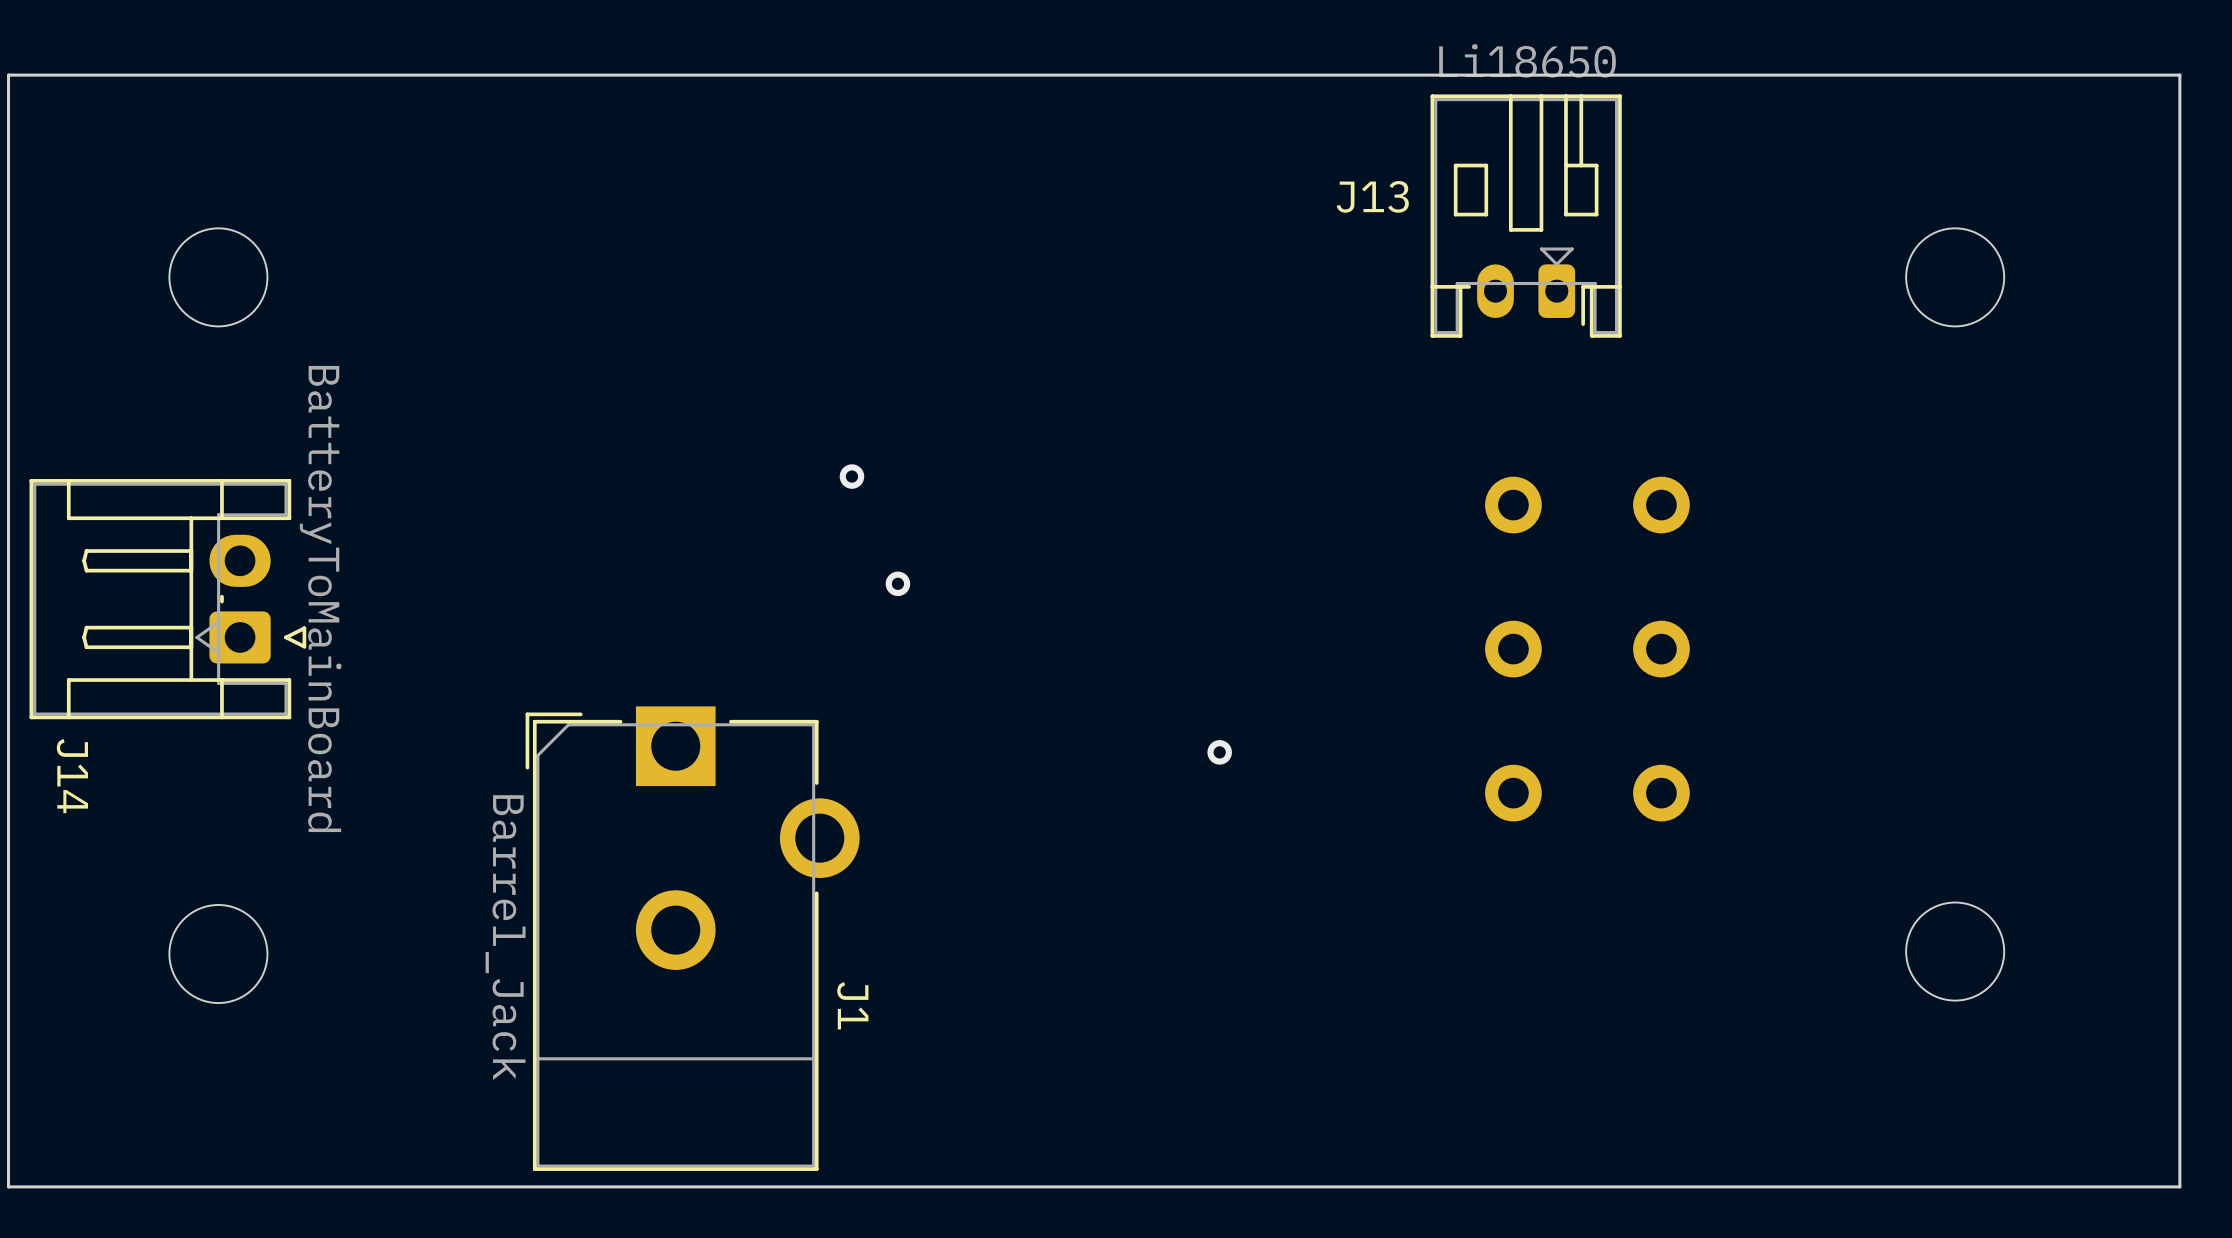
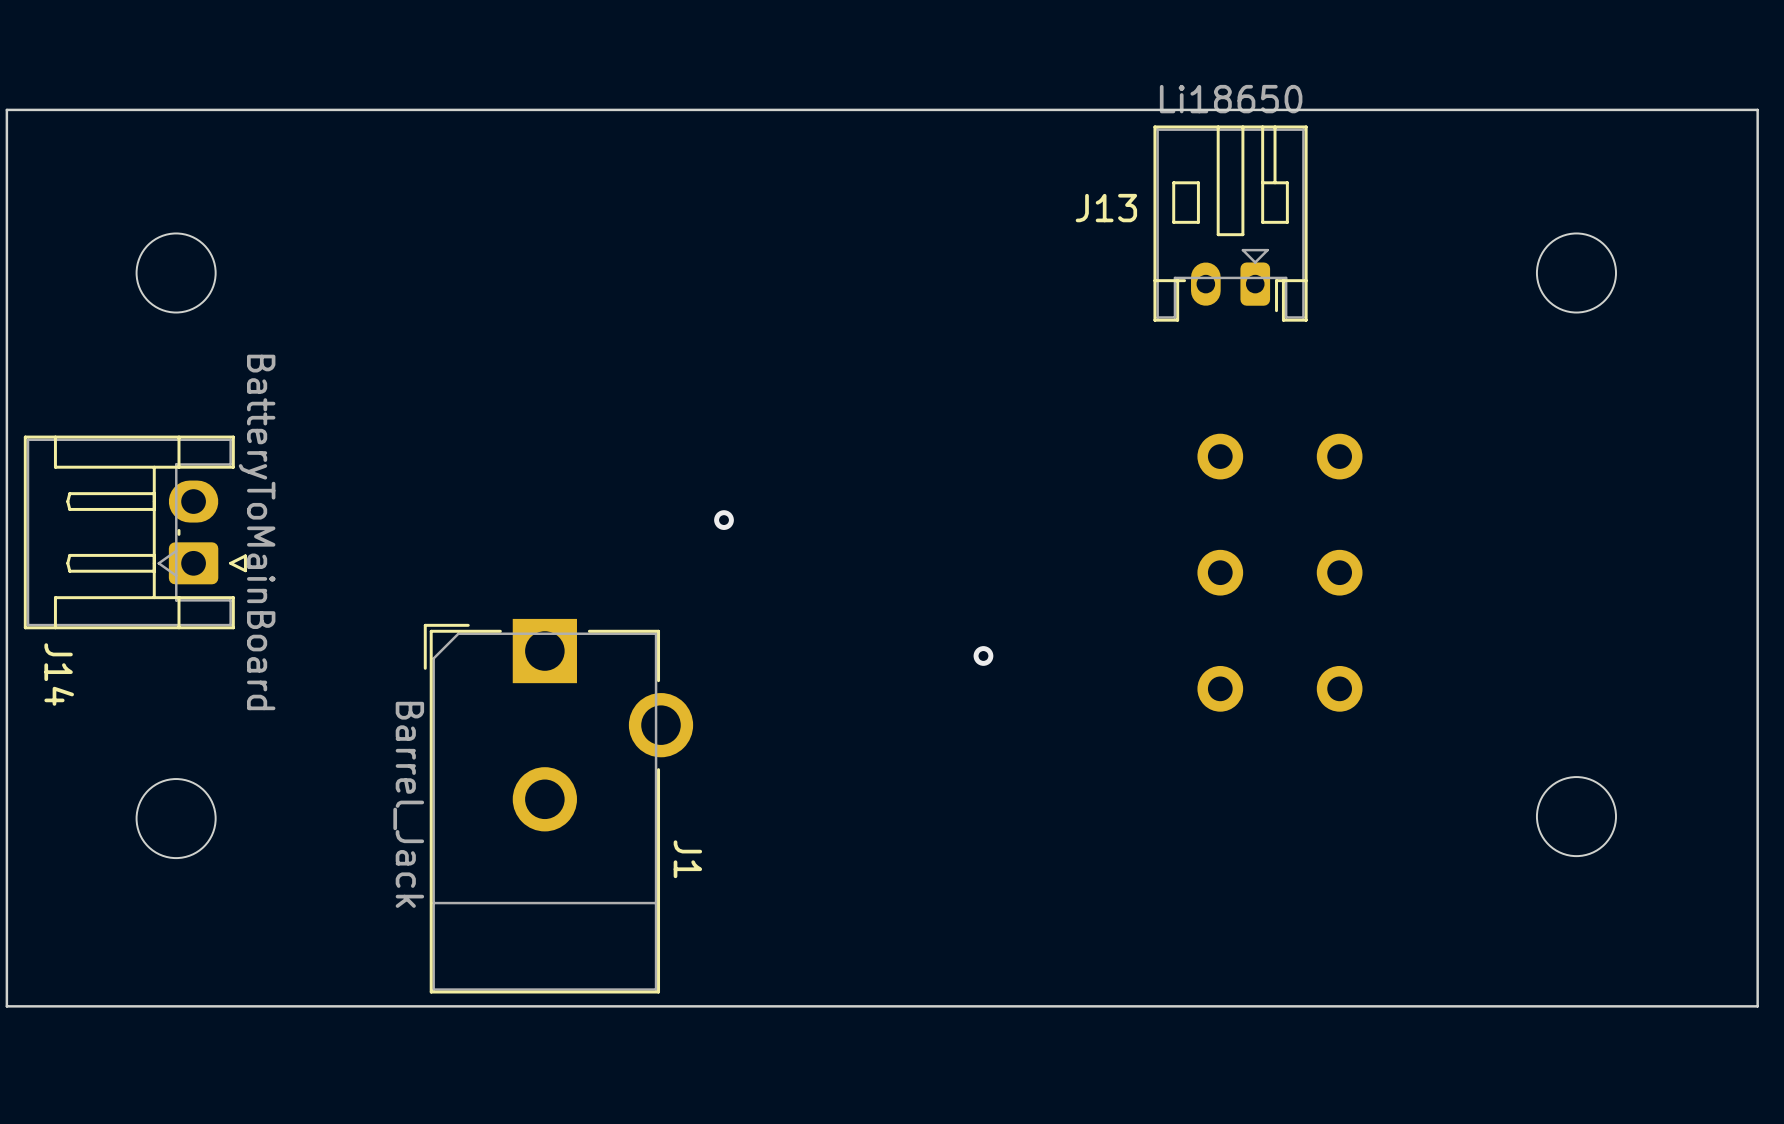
via: (851, 476) -> none

